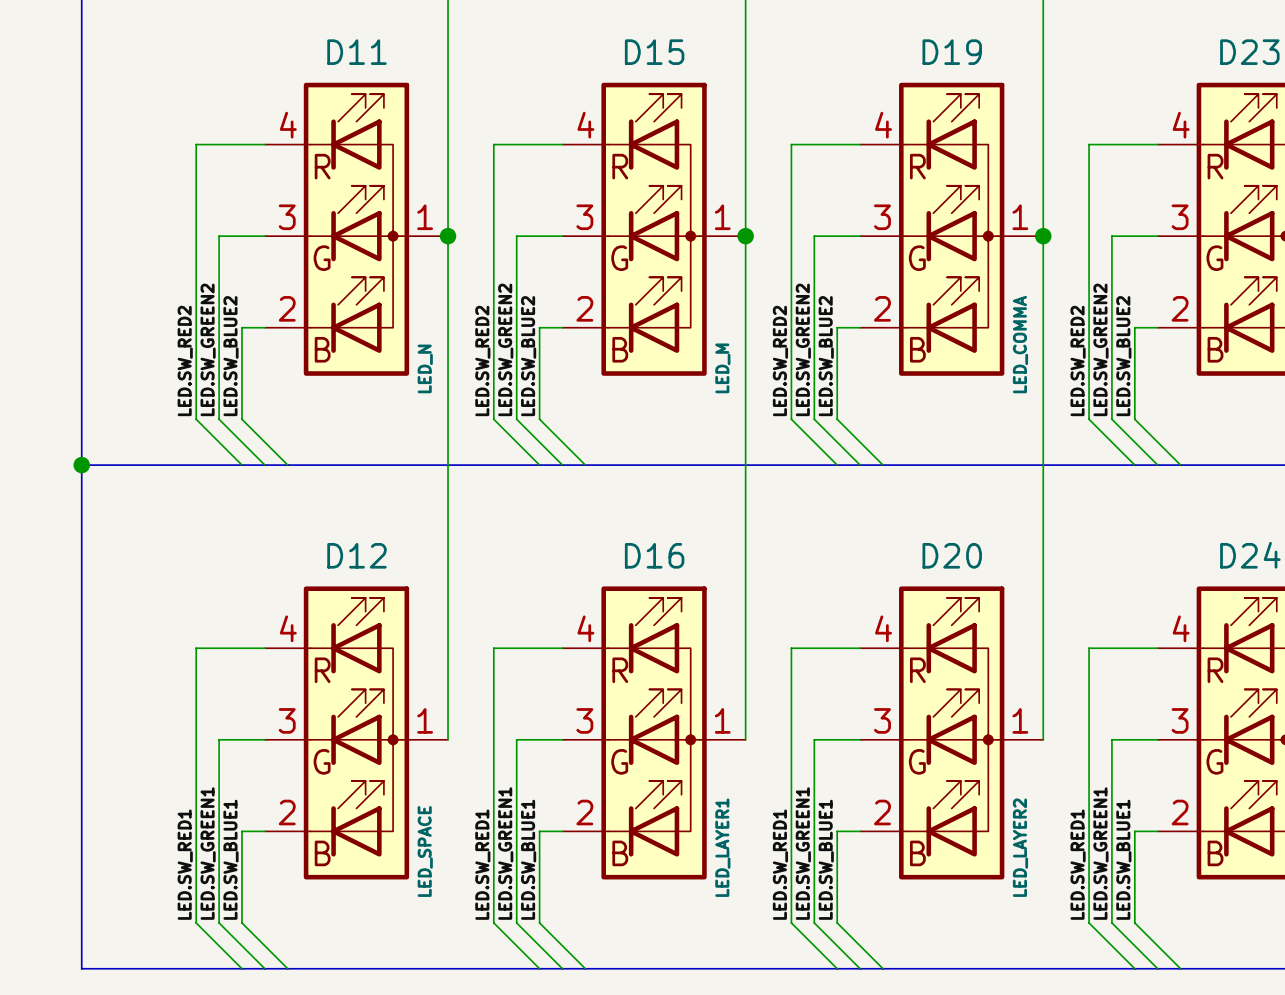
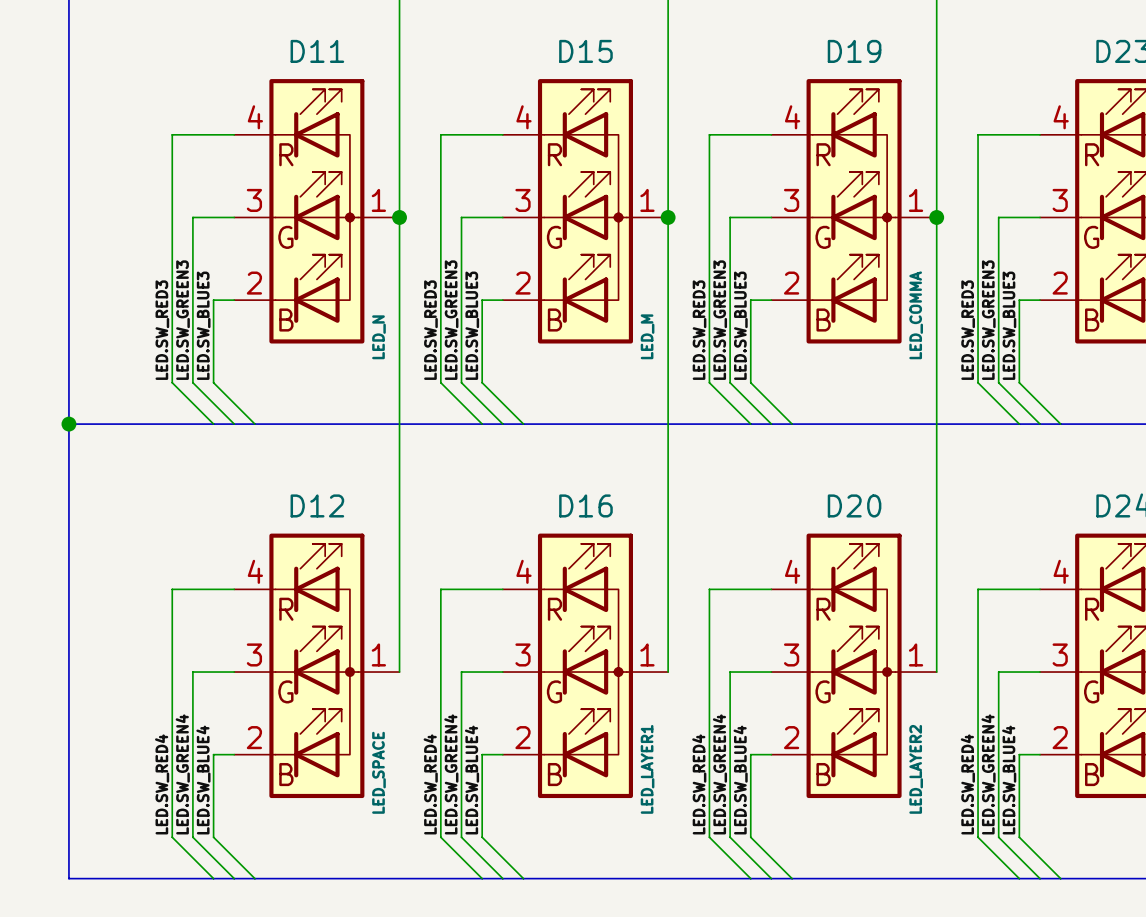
label: LED.SW_GREEN2 (208, 349) -> LED.SW_GREEN3 (183, 320)
label: LED.SW_GREEN2 (505, 349) -> LED.SW_GREEN3 (451, 320)
label: LED.SW_GREEN2 (803, 349) -> LED.SW_GREEN3 (720, 320)
label: LED.SW_GREEN2 (1100, 349) -> LED.SW_GREEN3 (988, 320)
label: LED.SW_BLUE2 (231, 356) -> LED.SW_BLUE3 (203, 325)
label: LED.SW_BLUE2 (528, 356) -> LED.SW_BLUE3 (472, 325)
label: LED.SW_BLUE2 (826, 356) -> LED.SW_BLUE3 (740, 325)
label: LED.SW_BLUE2 (1123, 356) -> LED.SW_BLUE3 (1009, 325)
label: LED.SW_RED2 (185, 360) -> LED.SW_RED3 (162, 330)
label: LED.SW_RED2 (482, 360) -> LED.SW_RED3 (430, 330)
label: LED.SW_RED2 (780, 360) -> LED.SW_RED3 (699, 330)
label: LED.SW_RED2 (1078, 360) -> LED.SW_RED3 (968, 330)
label: LED.SW_GREEN1 (208, 853) -> LED.SW_GREEN4 (182, 774)
label: LED.SW_GREEN1 (505, 853) -> LED.SW_GREEN4 (451, 774)
label: LED.SW_GREEN1 (803, 853) -> LED.SW_GREEN4 (719, 774)
label: LED.SW_GREEN1 (1100, 853) -> LED.SW_GREEN4 (988, 774)
label: LED.SW_BLUE1 (231, 859) -> LED.SW_BLUE4 (203, 780)
label: LED.SW_BLUE1 (528, 859) -> LED.SW_BLUE4 (472, 780)
label: LED.SW_BLUE1 (826, 859) -> LED.SW_BLUE4 (740, 780)
label: LED.SW_BLUE1 (1123, 859) -> LED.SW_BLUE4 (1009, 780)
label: LED.SW_RED1 (185, 864) -> LED.SW_RED4 (162, 784)
label: LED.SW_RED1 (482, 864) -> LED.SW_RED4 (430, 784)
label: LED.SW_RED1 (780, 864) -> LED.SW_RED4 (699, 784)
label: LED.SW_RED1 (1078, 864) -> LED.SW_RED4 (967, 784)

